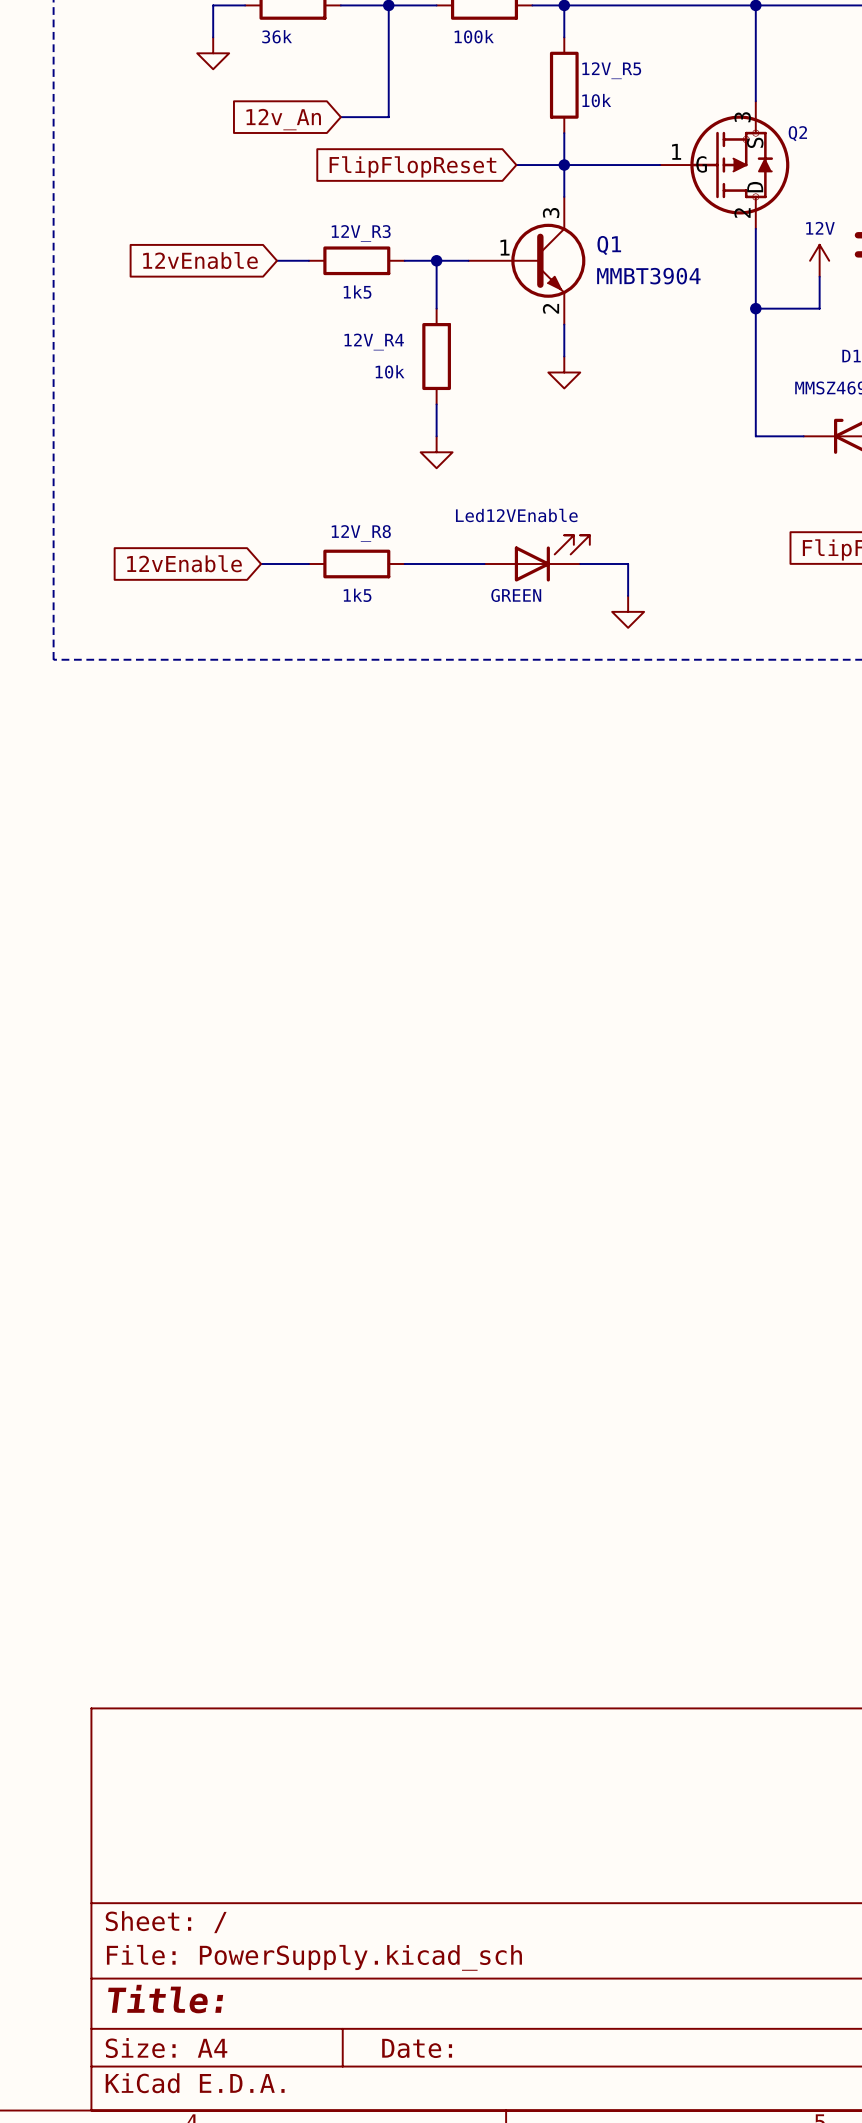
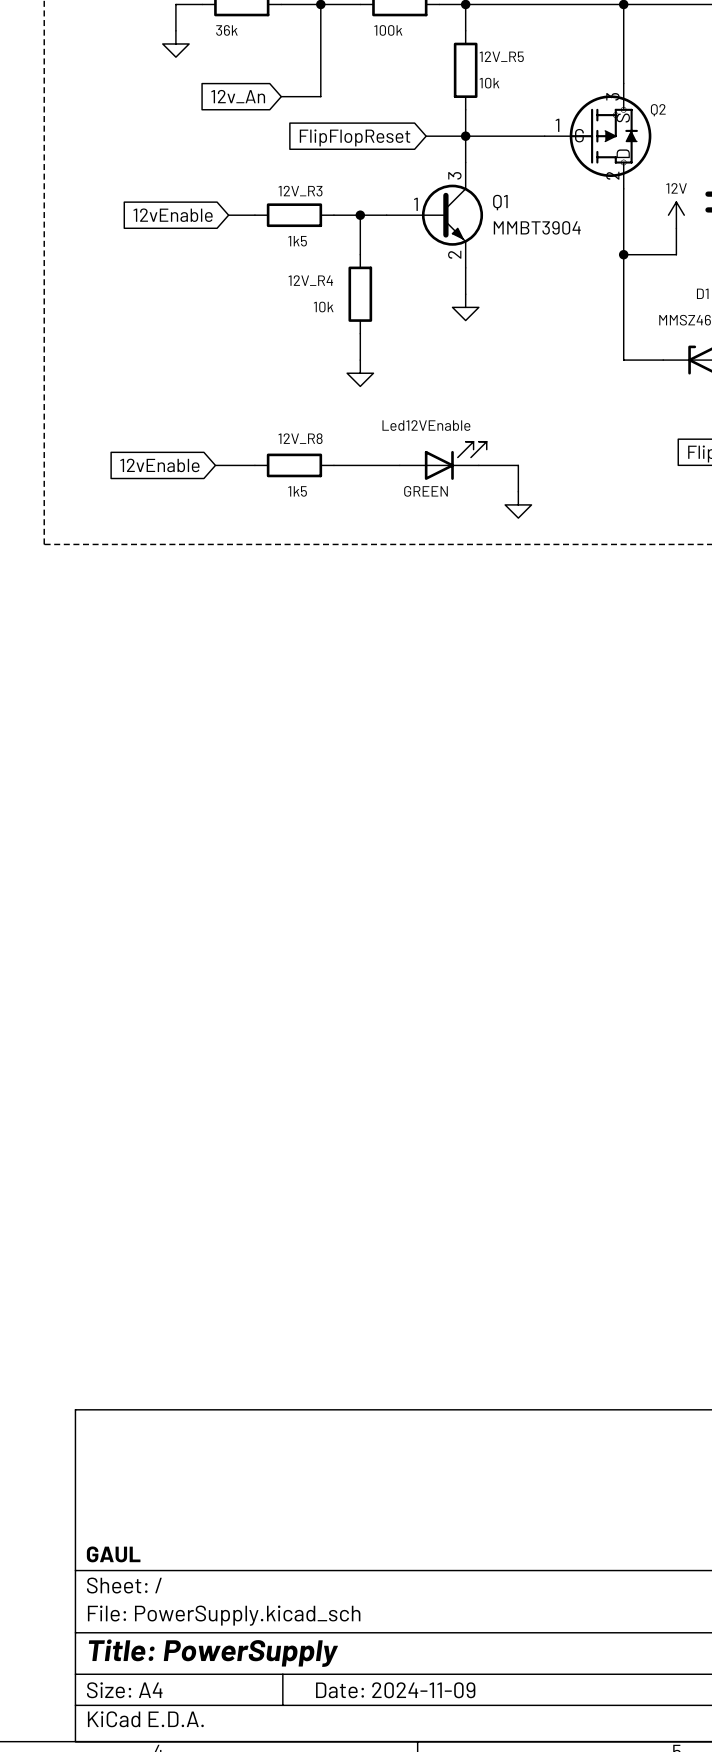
title block: none -> GAUL (113, 1554)
title block: Title: (165, 1999) -> Title: PowerSupply (213, 1653)
title block: Date: (417, 2048) -> Date: 2024-11-09 (395, 1690)

